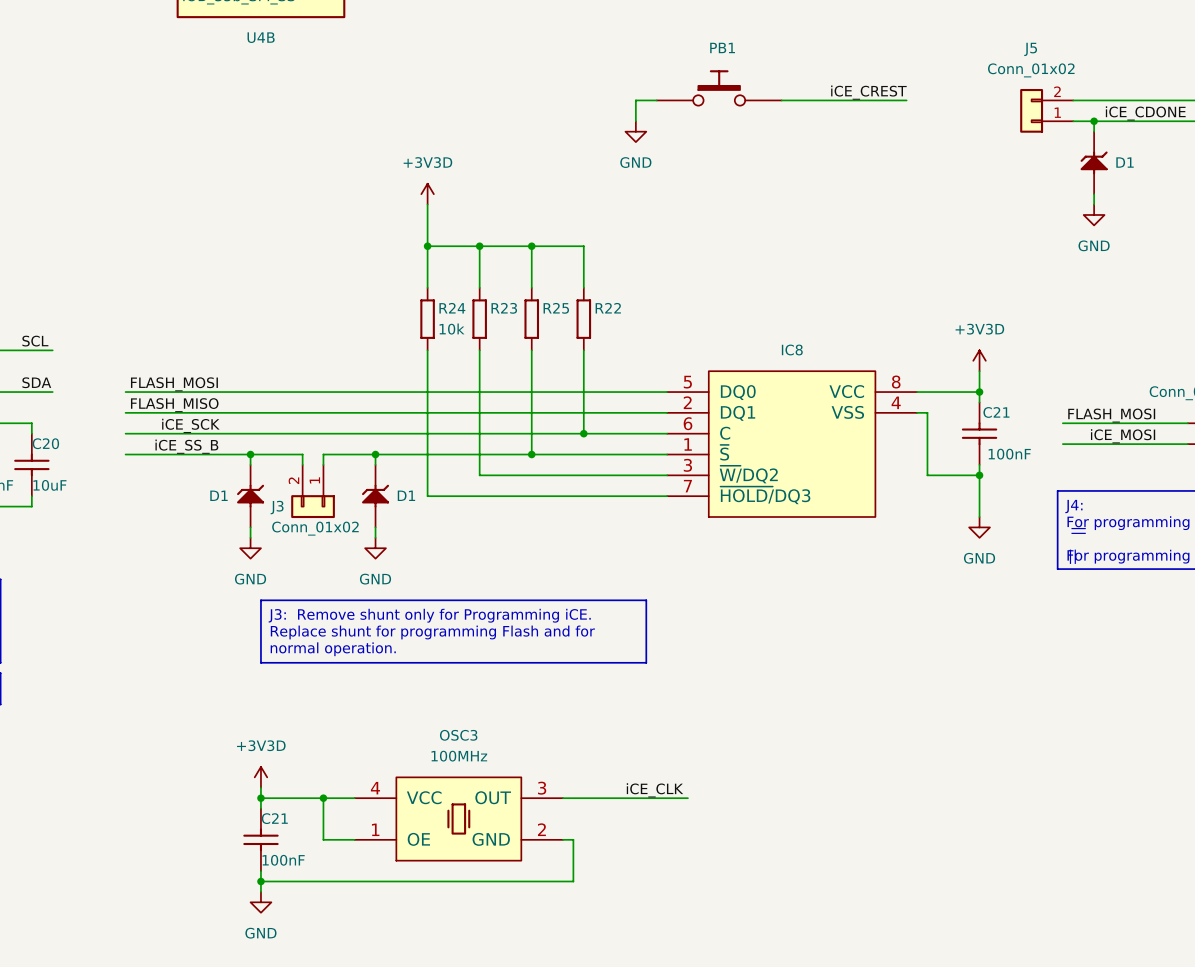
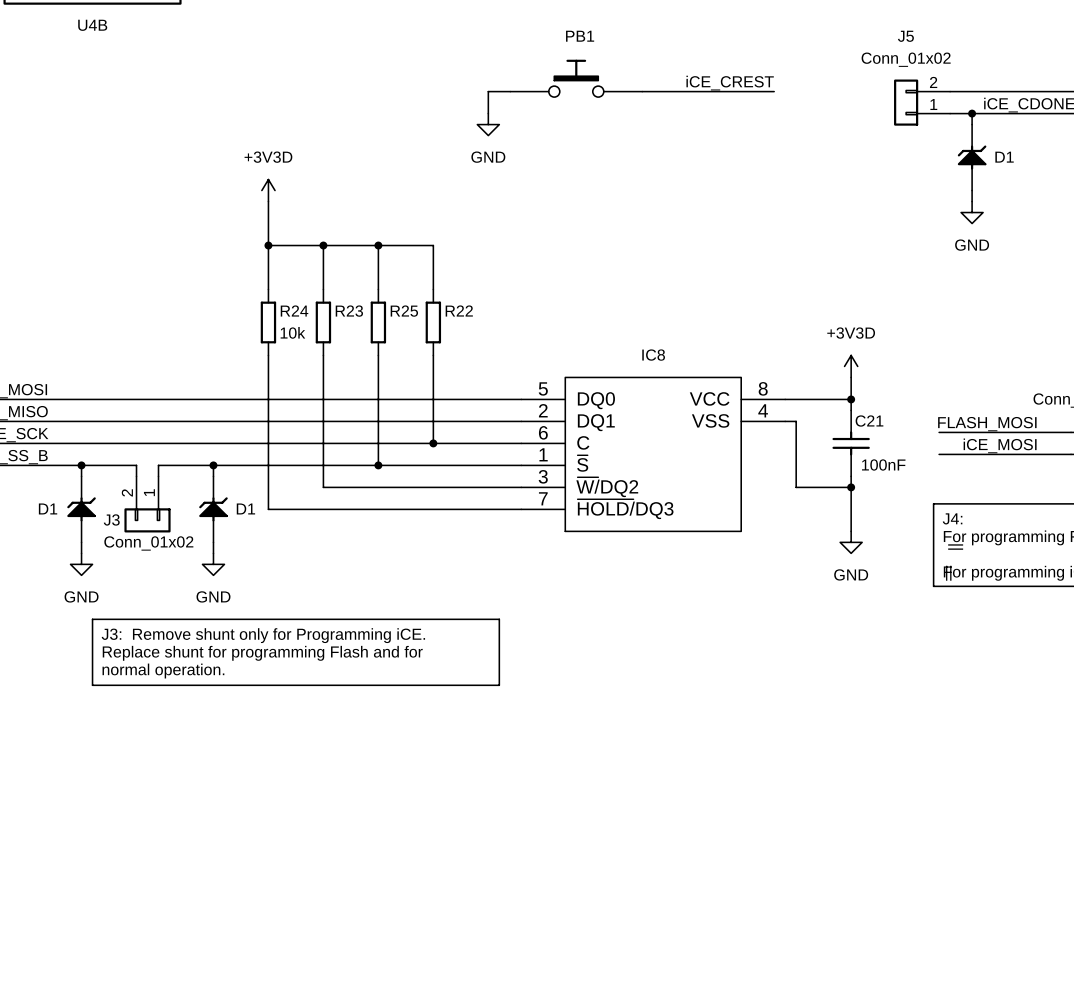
power symbol: +3V3D (260, 777) -> none
wire: (260, 787) (260, 808) -> none
label: iCE_CLK (654, 790) -> none
wire: (260, 798) (354, 798) -> none
junction: (260, 798) -> none
wire: (323, 798) (323, 839) (354, 839) -> none
junction: (323, 798) -> none
wire: (562, 798) (687, 798) -> none
OSC3: (458, 819) -> none
C21: (260, 839) -> none
wire: (562, 839) (573, 839) (573, 881) (260, 881) -> none
wire: (260, 871) (260, 891) -> none
junction: (260, 881) -> none
power symbol: GND (260, 902) -> none

